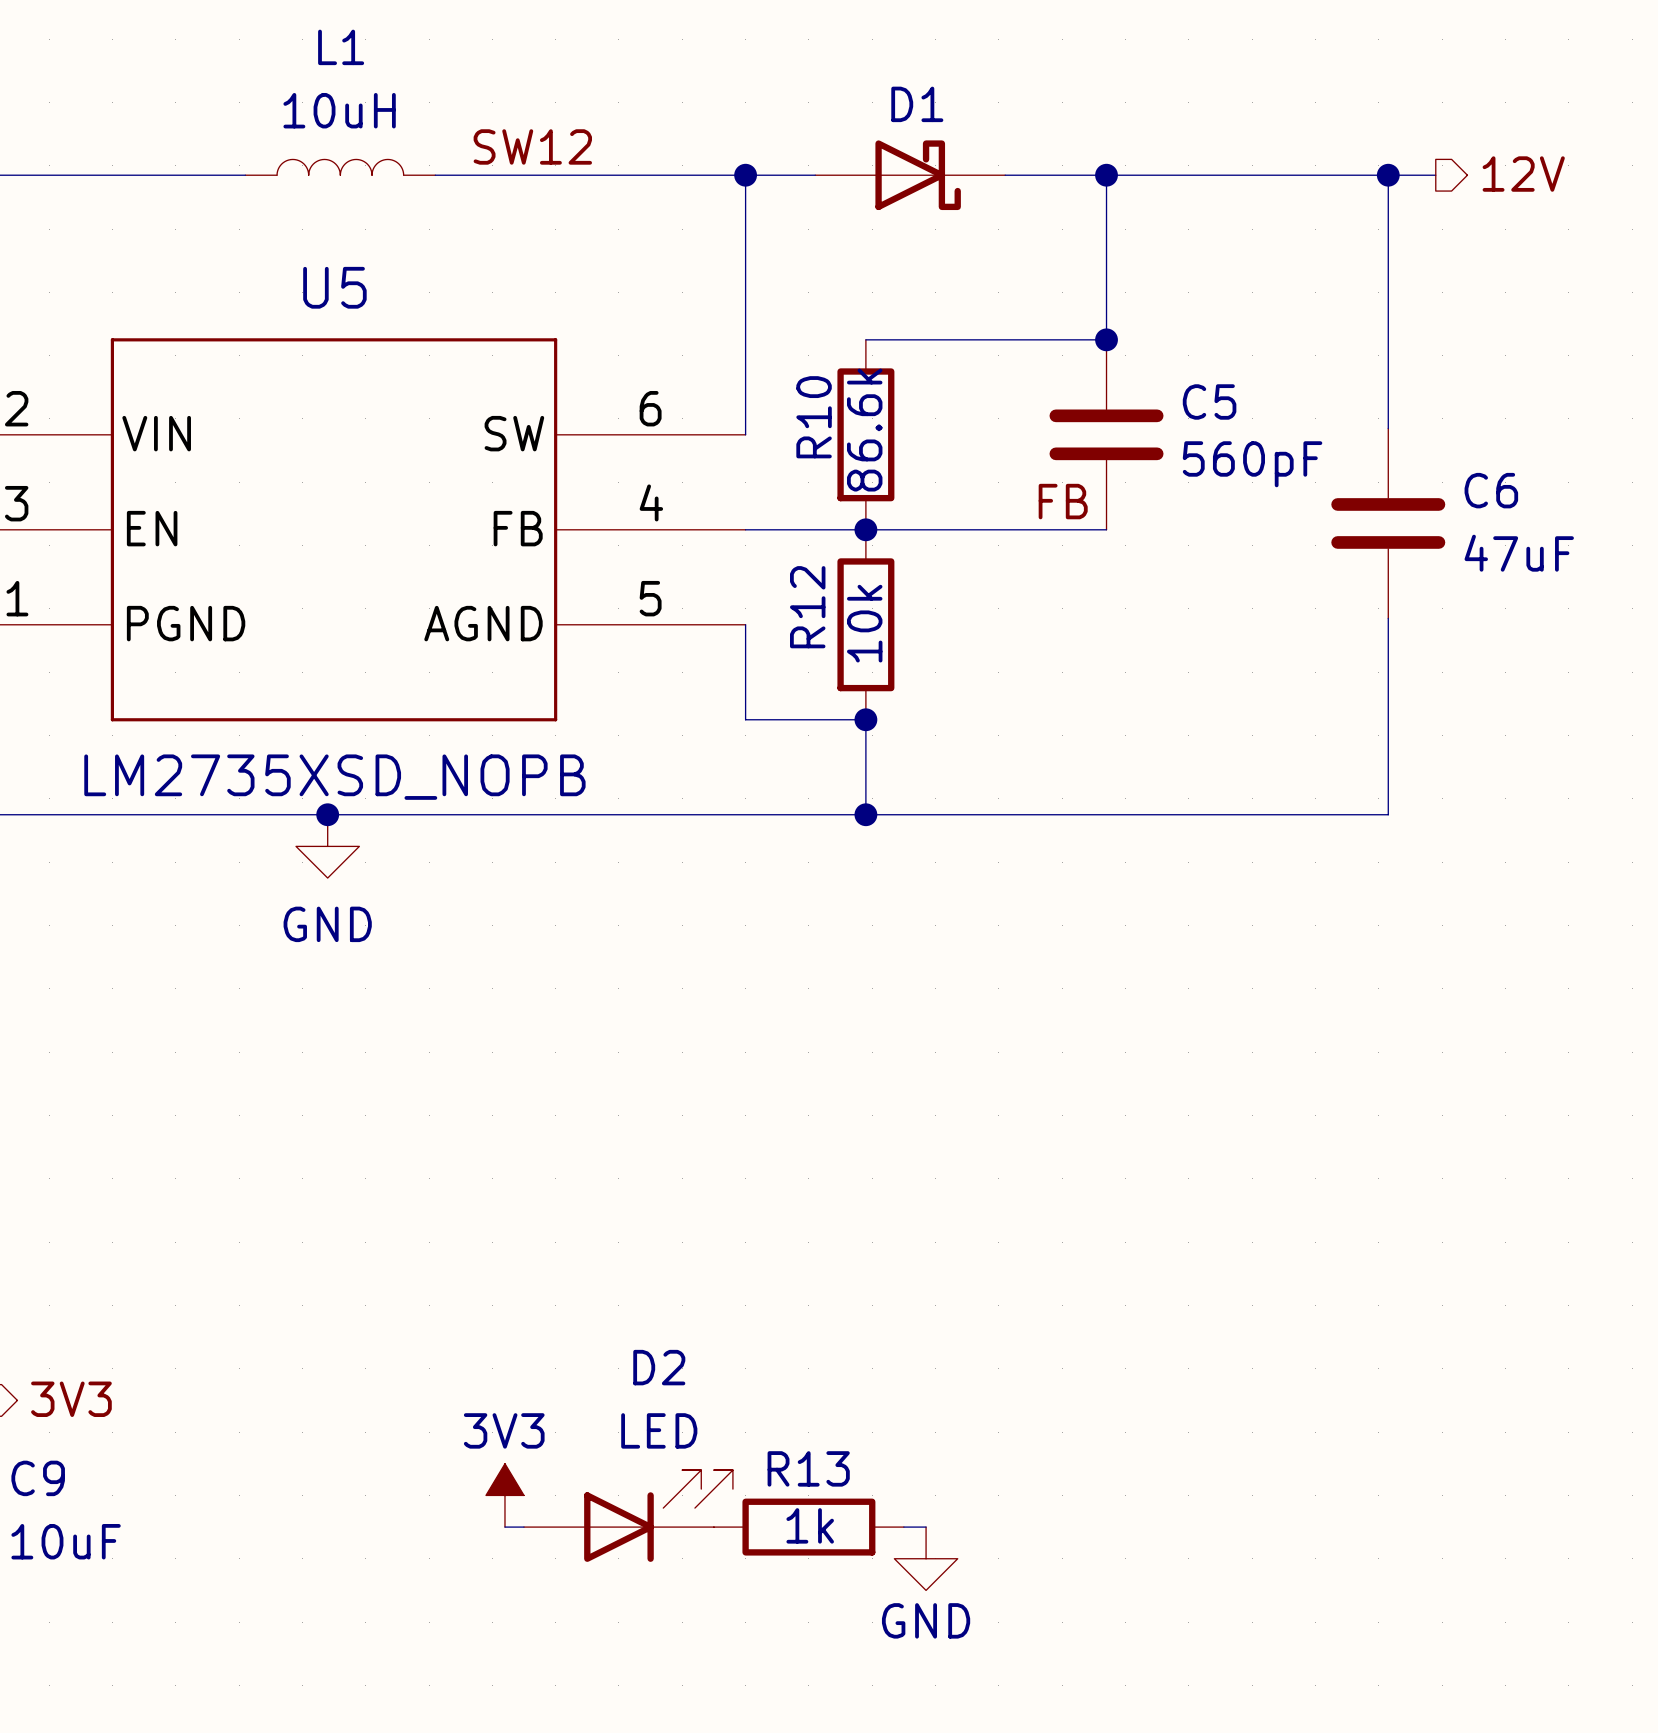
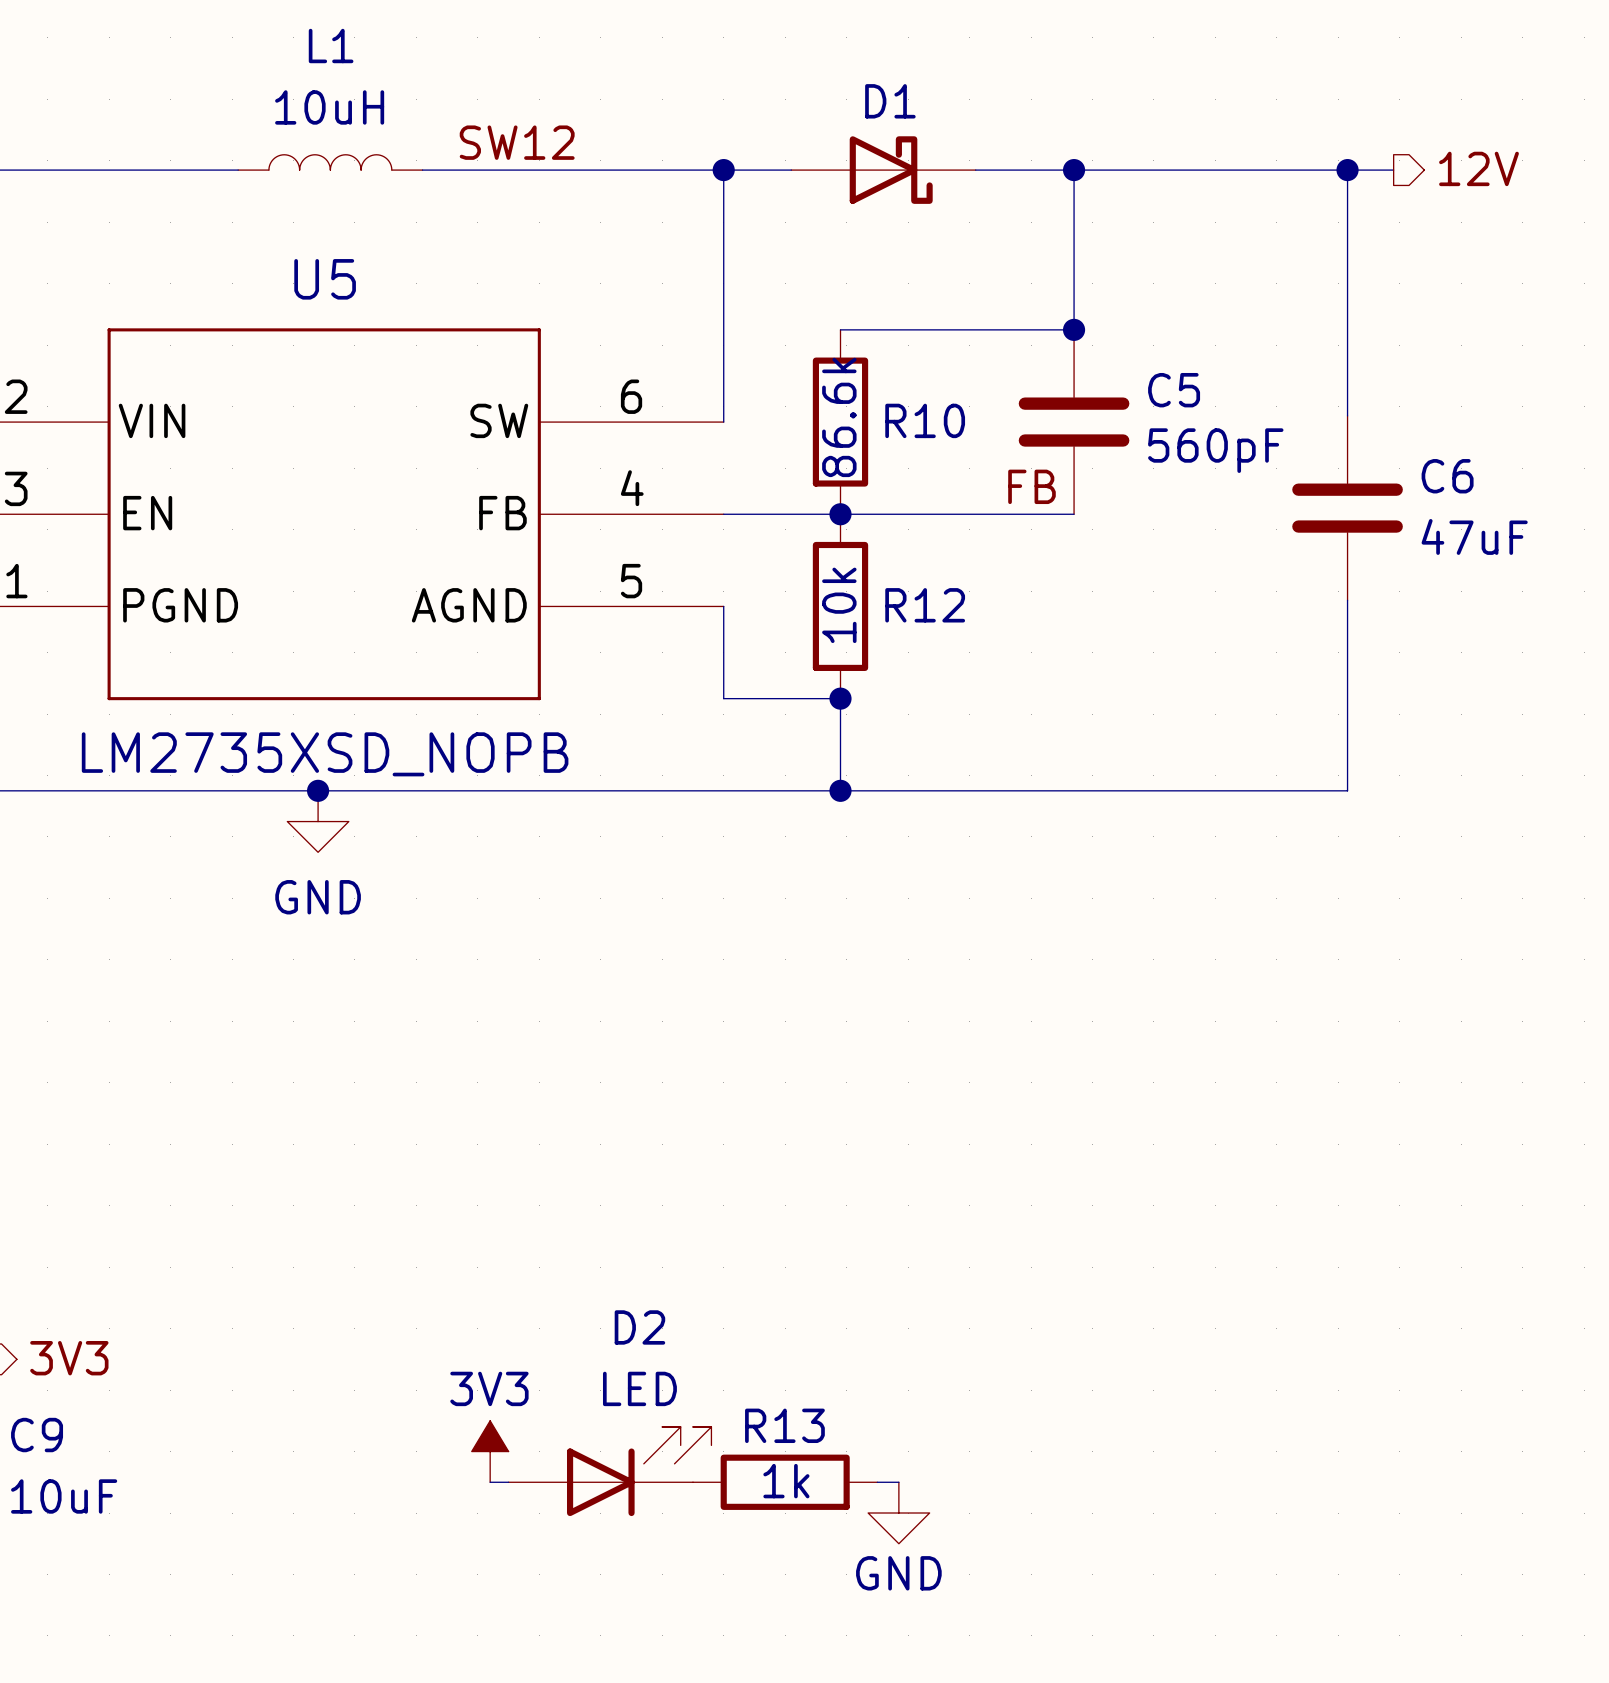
R10 name rotation: 0° (814, 417) -> 90° clockwise (925, 420)
R10 name position: R10 (814, 417) -> R10 (925, 420)
R12 name rotation: 0° (807, 607) -> 90° clockwise (925, 605)
R12 name position: R12 (807, 607) -> R12 (925, 605)

